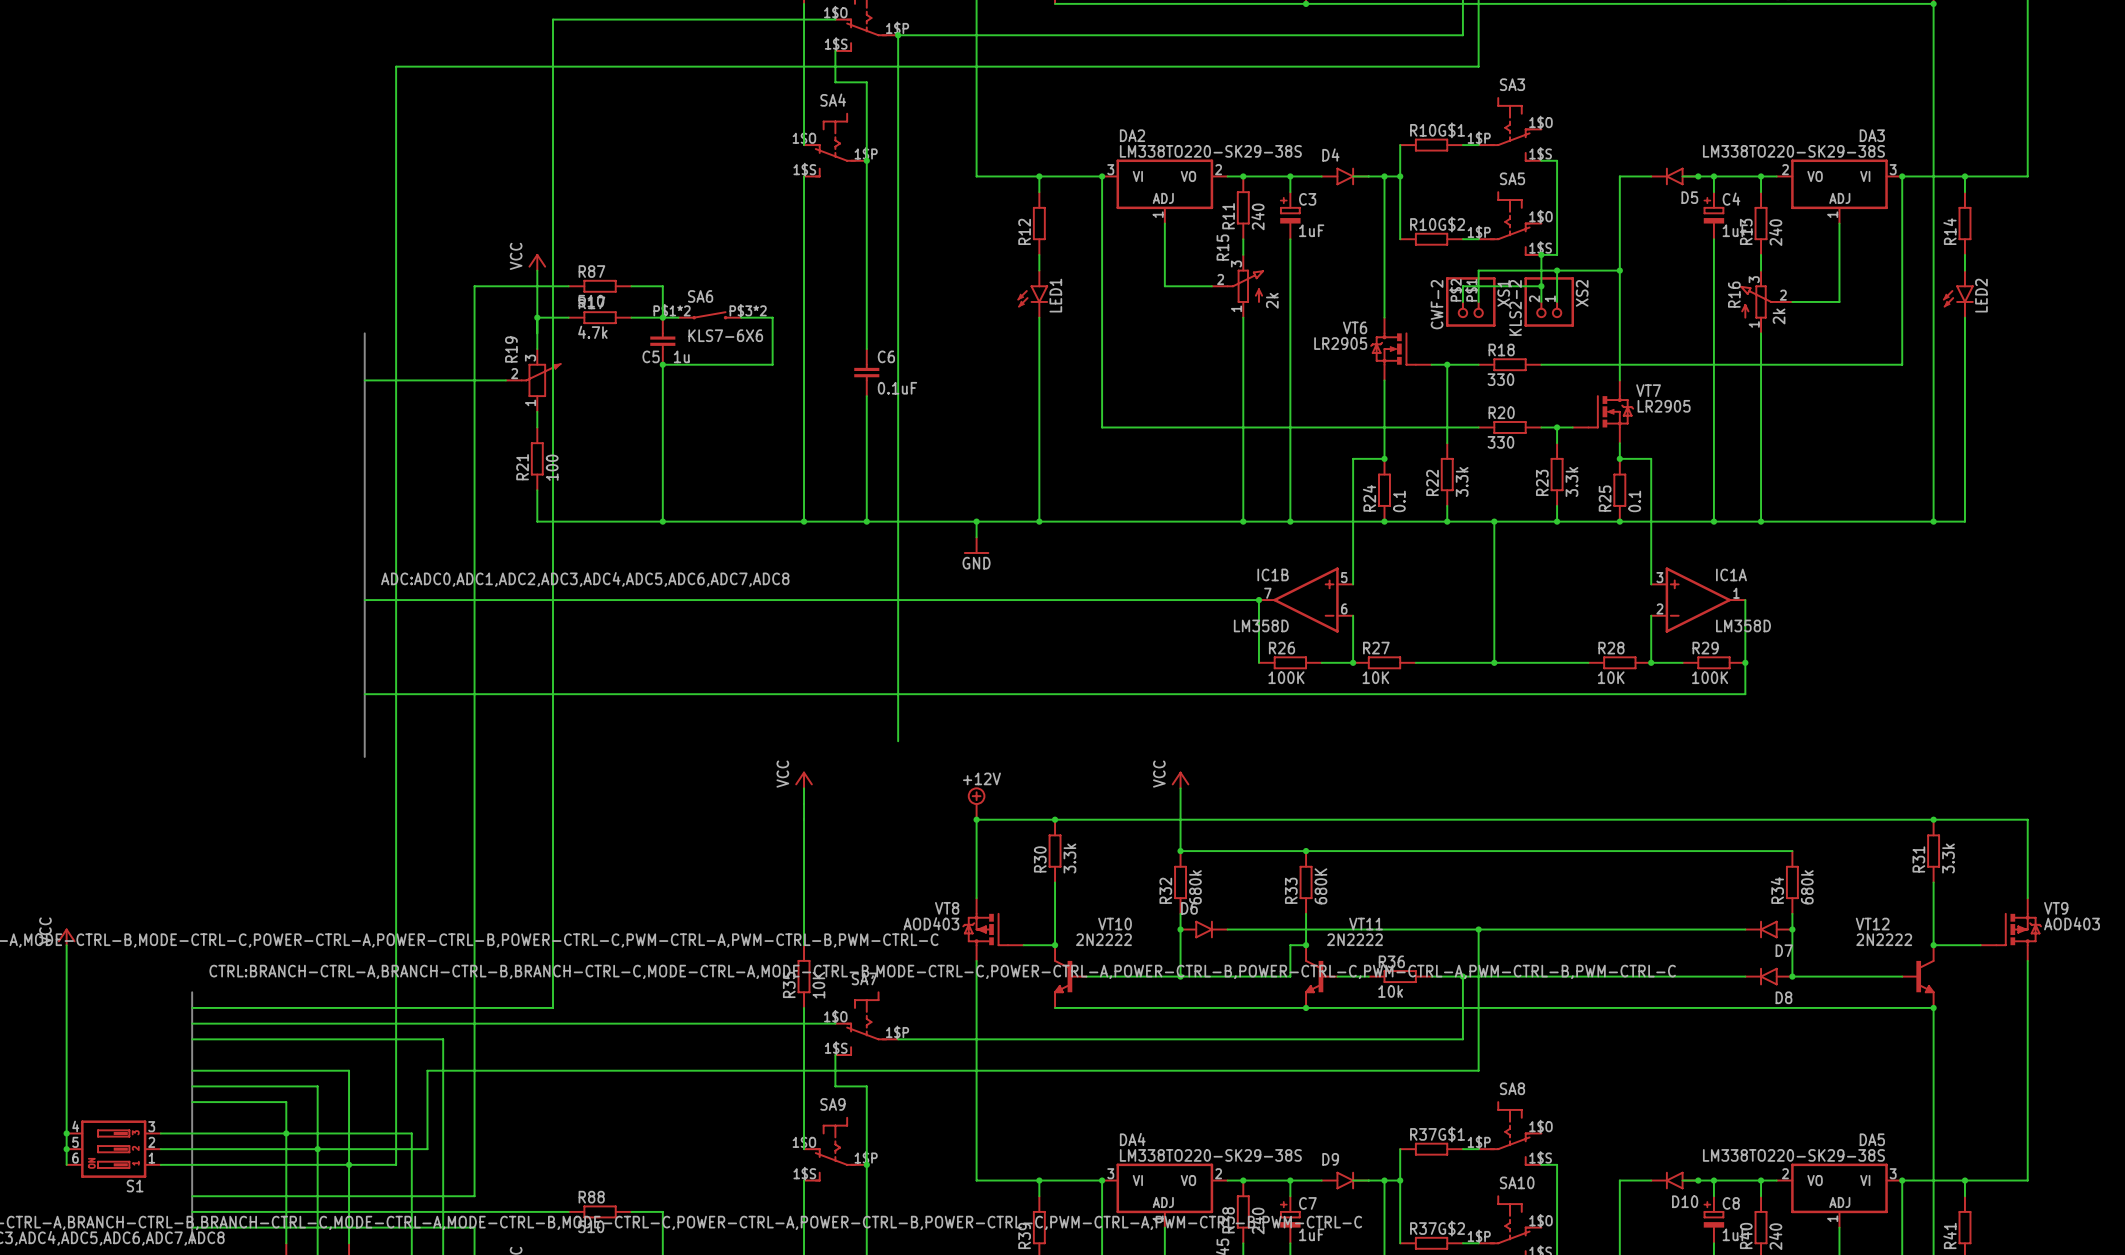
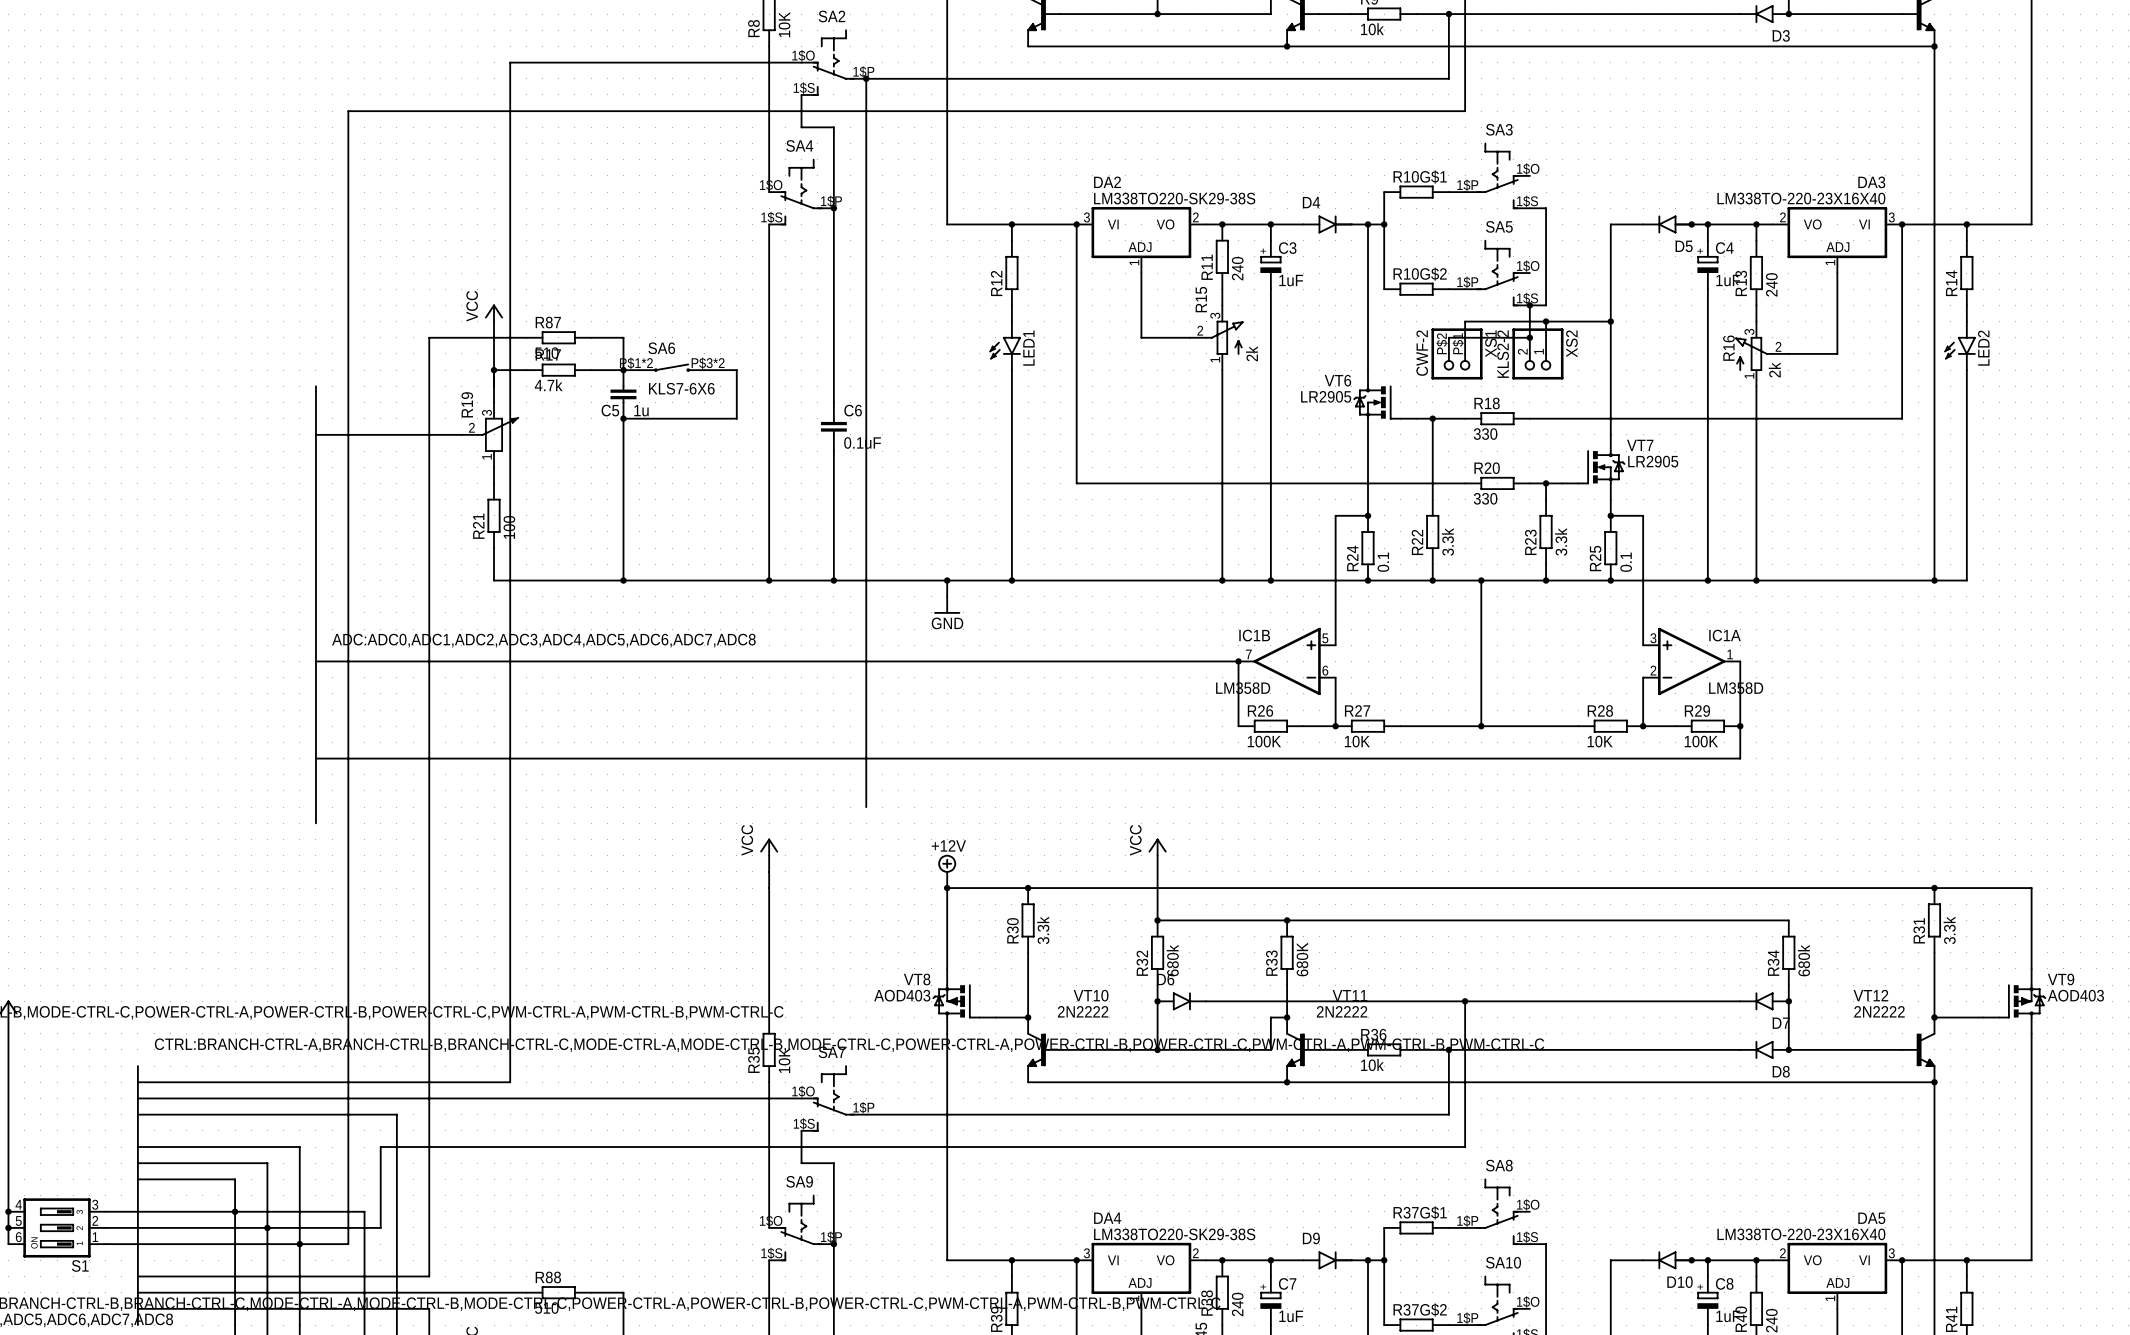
DA3 value: LM338TO220-SK29-38S (1793, 151) -> LM338TO-220-23X16X40 (1801, 198)
DA5 value: LM338TO220-SK29-38S (1793, 1155) -> LM338TO-220-23X16X40 (1801, 1234)

